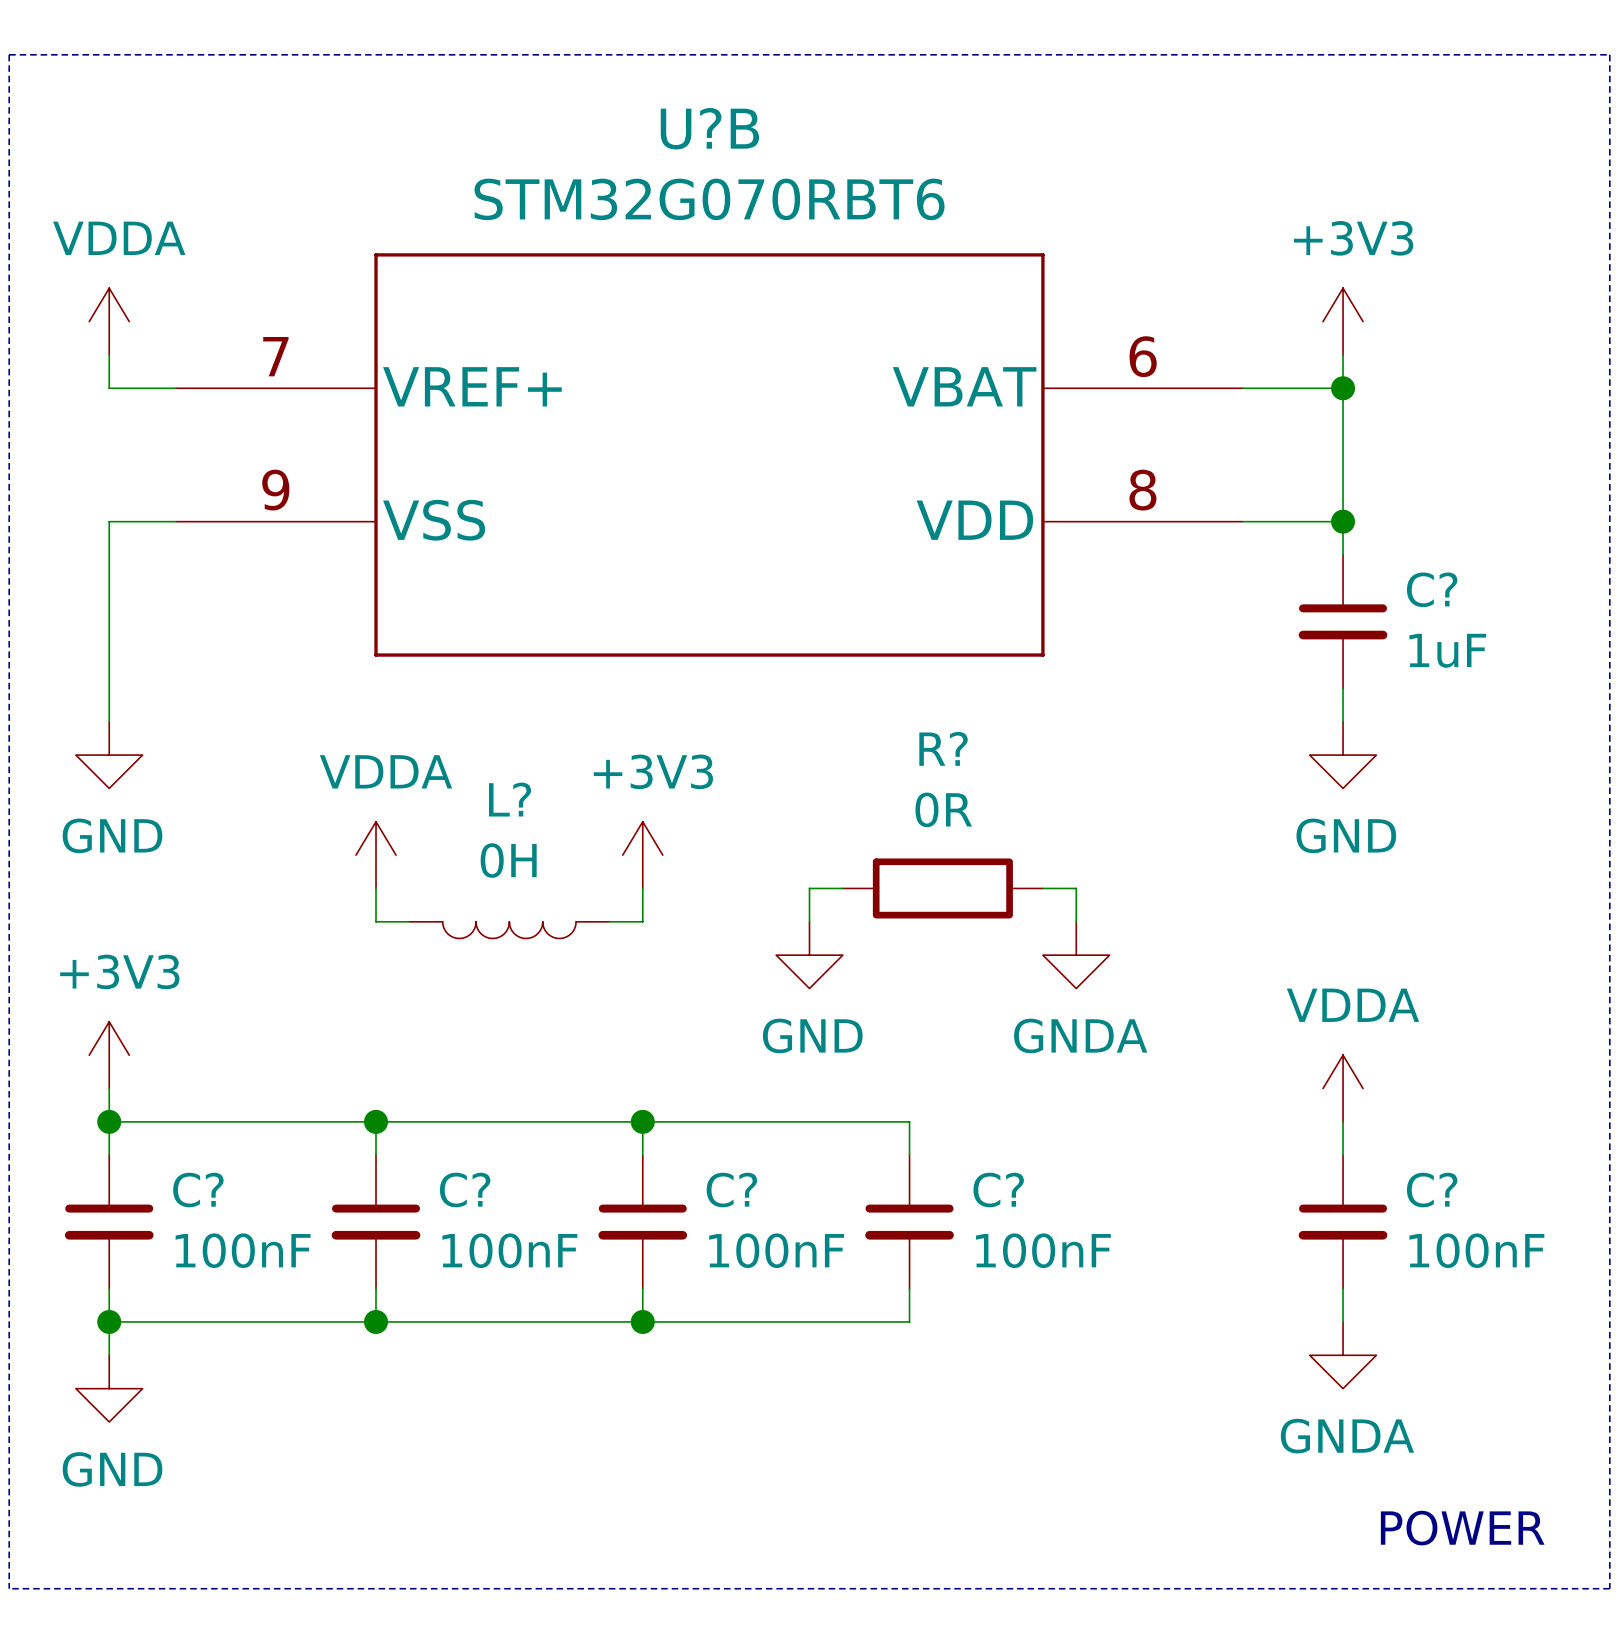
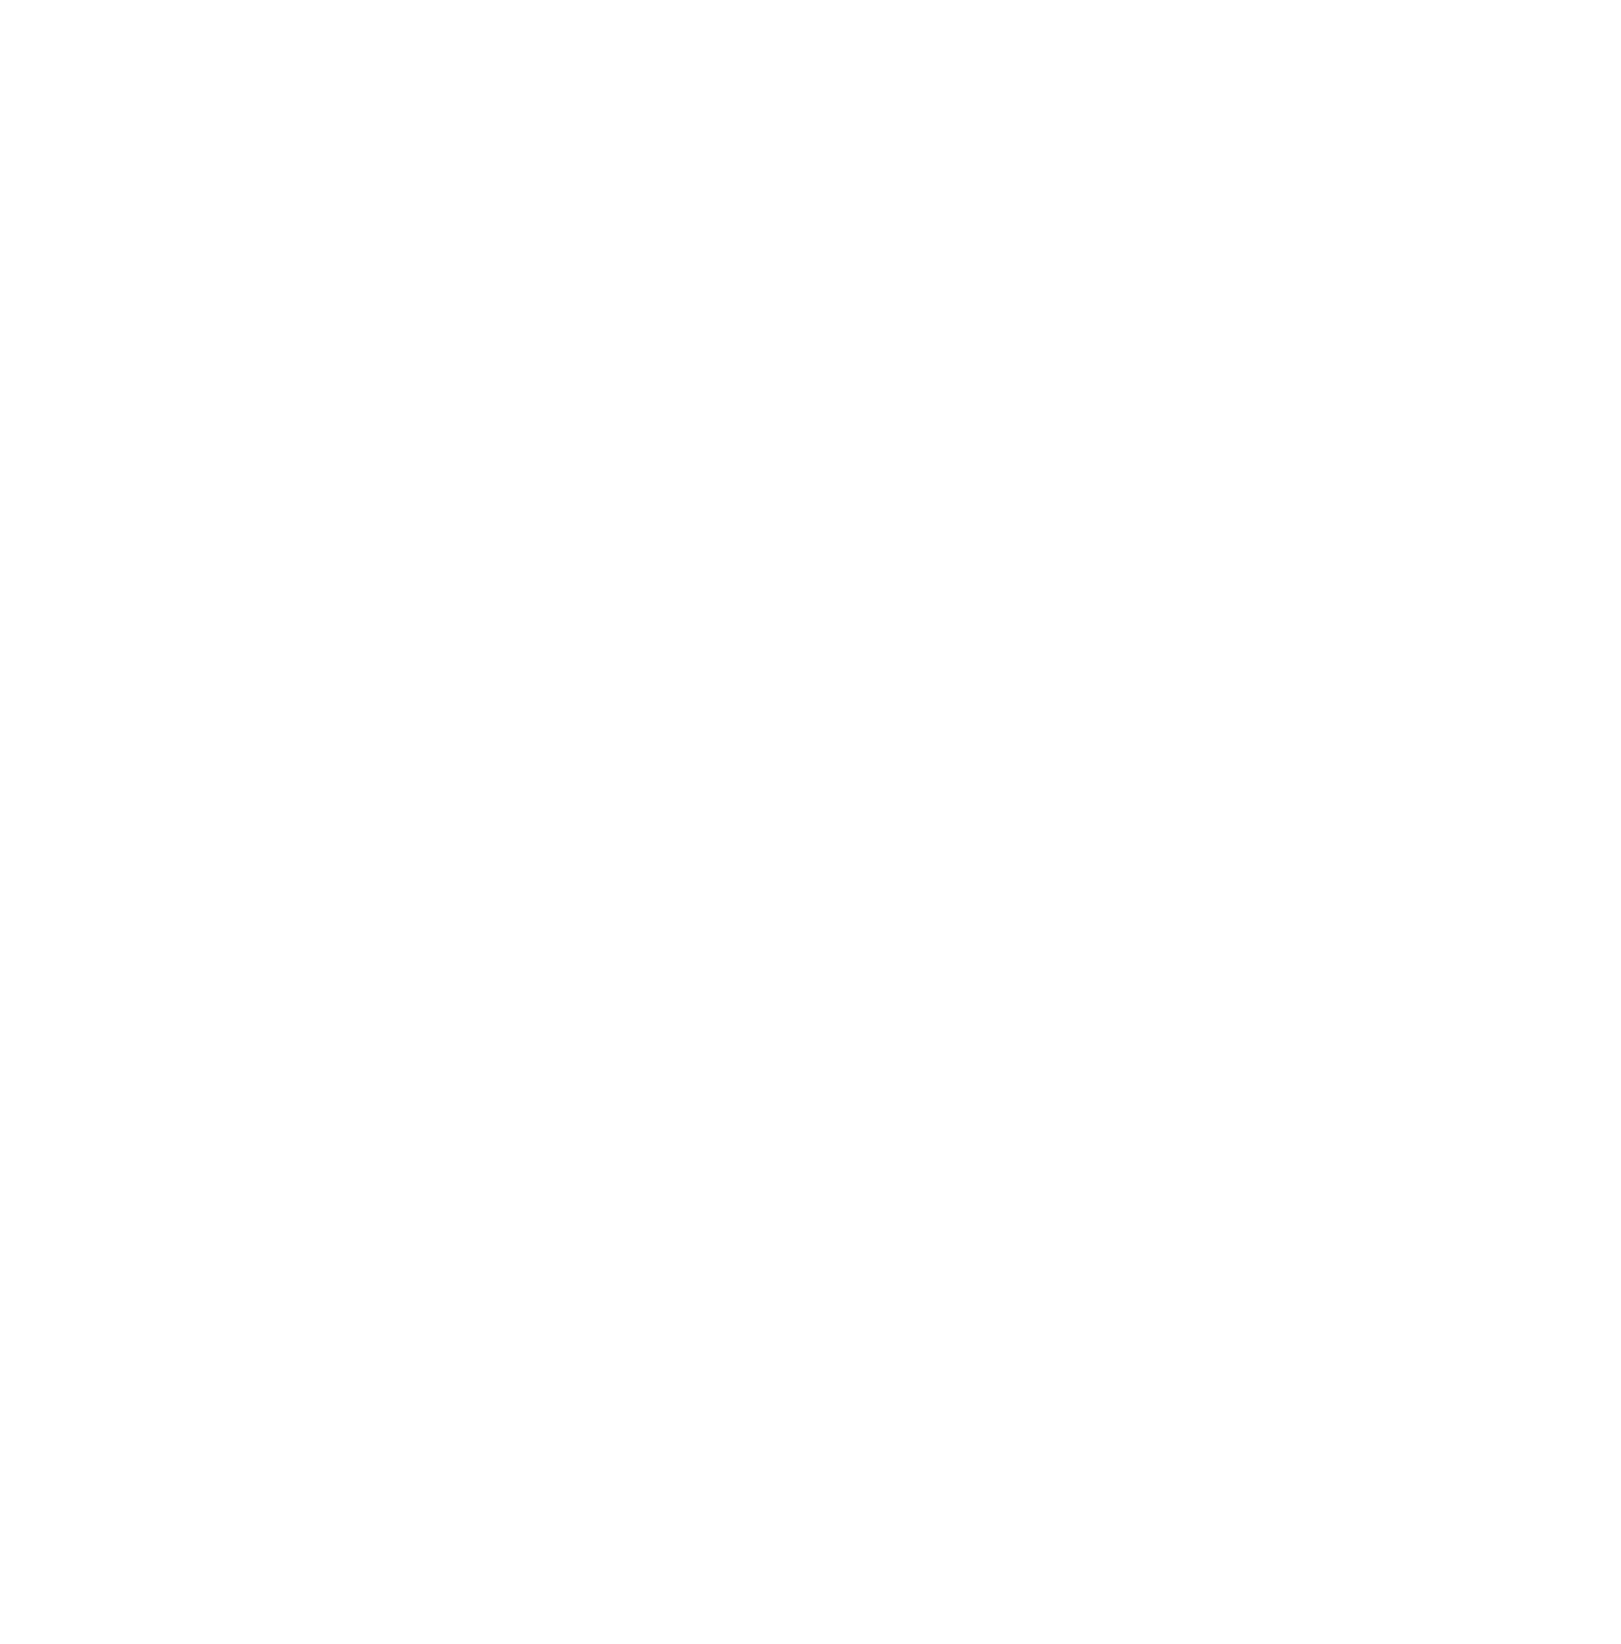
line: (9, 54) (1609, 54) (1609, 1588) (9, 1588) (9, 54) -> none
power symbol: VDDA (109, 321) -> none
power symbol: +3V3 (1343, 321) -> none
wire: (109, 354) (109, 388) (175, 388) -> none
wire: (1343, 354) (1343, 555) -> none
wire: (1243, 388) (1343, 388) -> none
junction: (1343, 388) -> none
U?B: STM32G070RBT6 (709, 454) -> none
wire: (175, 521) (109, 521) (109, 721) -> none
wire: (1243, 521) (1343, 521) -> none
junction: (1343, 521) -> none
C?: 1uF (1343, 621) -> none
wire: (1343, 688) (1343, 721) -> none
power symbol: GND (109, 755) -> none
power symbol: GND (1343, 755) -> none
power symbol: VDDA (376, 855) -> none
power symbol: +3V3 (642, 855) -> none
wire: (376, 888) (376, 921) (409, 921) -> none
wire: (642, 888) (642, 921) (609, 921) -> none
wire: (842, 888) (809, 888) (809, 921) -> none
R?: 0R (942, 888) -> none
wire: (1042, 888) (1076, 888) (1076, 921) -> none
L?: 0H (509, 930) -> none
power symbol: GND (809, 955) -> none
power symbol: GNDA (1076, 955) -> none
power symbol: +3V3 (109, 1055) -> none
wire: (109, 1088) (109, 1155) -> none
power symbol: VDDA (1343, 1088) -> none
wire: (109, 1121) (909, 1121) (909, 1155) -> none
junction: (109, 1121) -> none
wire: (376, 1121) (376, 1155) -> none
junction: (376, 1121) -> none
wire: (642, 1121) (642, 1155) -> none
junction: (642, 1121) -> none
wire: (1343, 1121) (1343, 1155) -> none
C?: 100nF (109, 1221) -> none
C?: 100nF (376, 1221) -> none
C?: 100nF (642, 1221) -> none
C?: 100nF (909, 1221) -> none
C?: 100nF (1343, 1221) -> none
wire: (109, 1288) (109, 1355) -> none
wire: (376, 1288) (376, 1321) -> none
wire: (642, 1288) (642, 1321) -> none
wire: (909, 1288) (909, 1321) (109, 1321) -> none
wire: (1343, 1288) (1343, 1321) -> none
junction: (109, 1321) -> none
junction: (376, 1321) -> none
junction: (642, 1321) -> none
power symbol: GNDA (1343, 1355) -> none
power symbol: GND (109, 1388) -> none
text: POWER (1462, 1528) -> none

